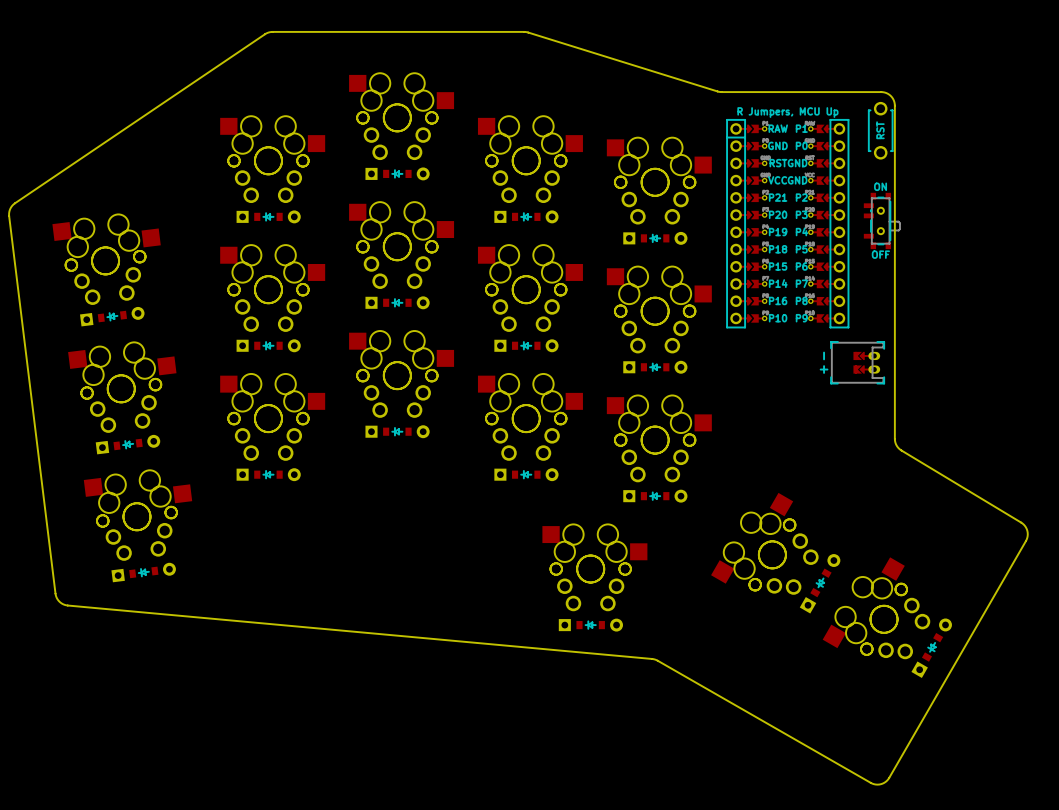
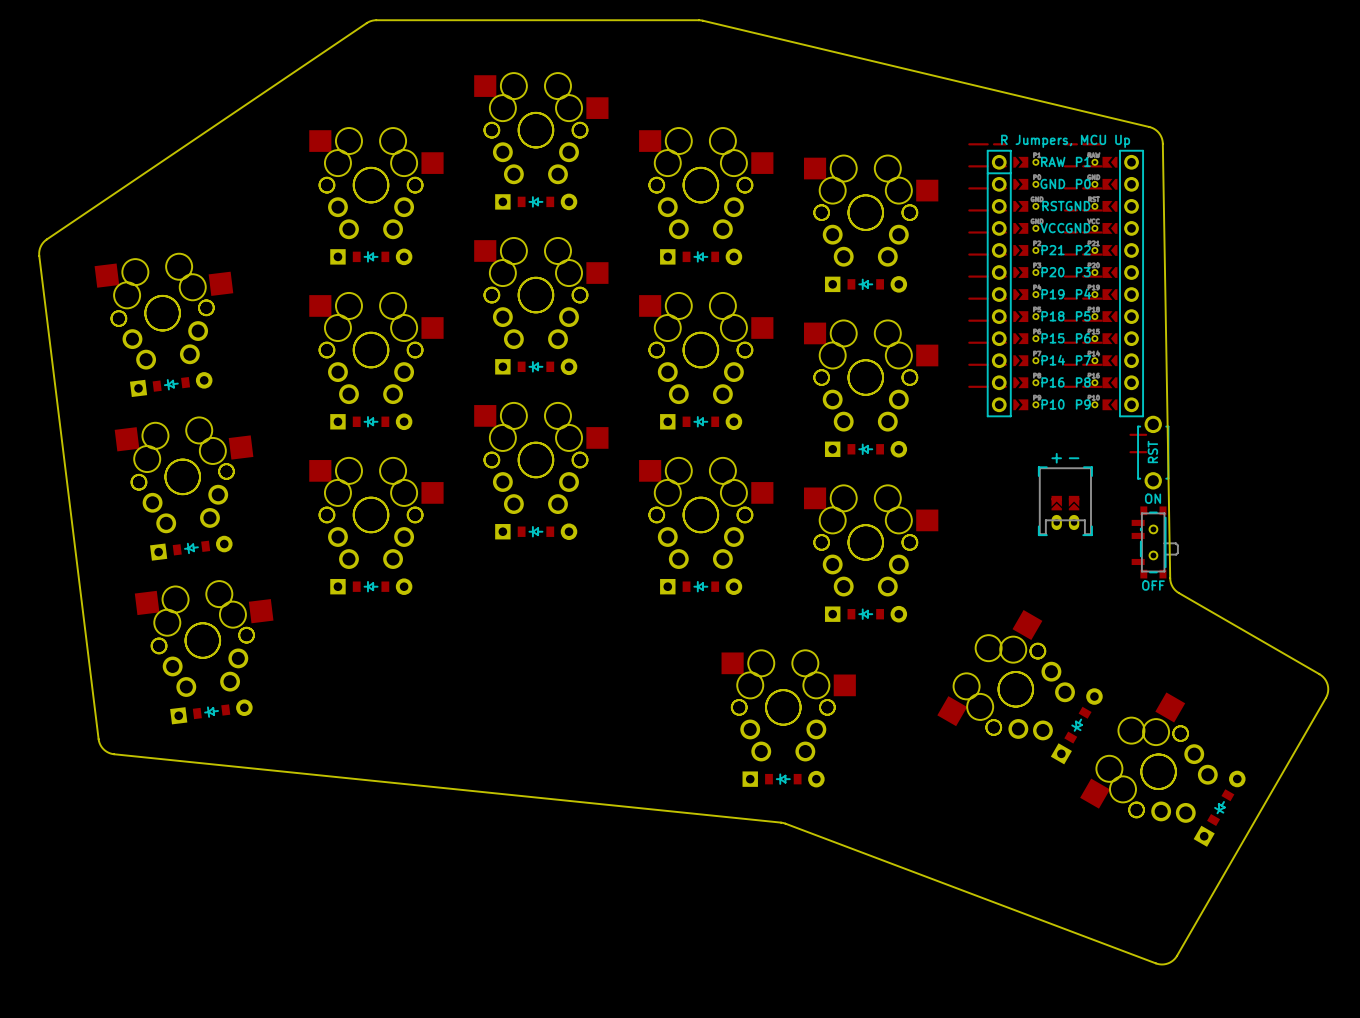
board edge: (524, 31) (719, 91) (881, 92) (889, 94) (893, 100) (895, 442) (901, 450) (1022, 523) (1027, 534) (1025, 541) (888, 779) (881, 784) (870, 782) (653, 659) (67, 605) (59, 601) (55, 593) -> (698, 20) (1149, 127) (1156, 130) (1161, 136) (1162, 143) (1170, 582) (1178, 593) (1321, 675) (1325, 680) (1328, 689) (1325, 697) (1175, 957) (1167, 963) (1155, 963) (783, 822) (114, 754) (103, 749) (98, 739)
part: (880, 130) -> none
part: (882, 220) -> none
part position: (787, 223) -> (1065, 283)
part rotation: 0° (852, 362) -> 90° clockwise (1065, 494)
part position: (852, 362) -> (1065, 494)
part: none -> (1153, 452)
part: none -> (1155, 542)

